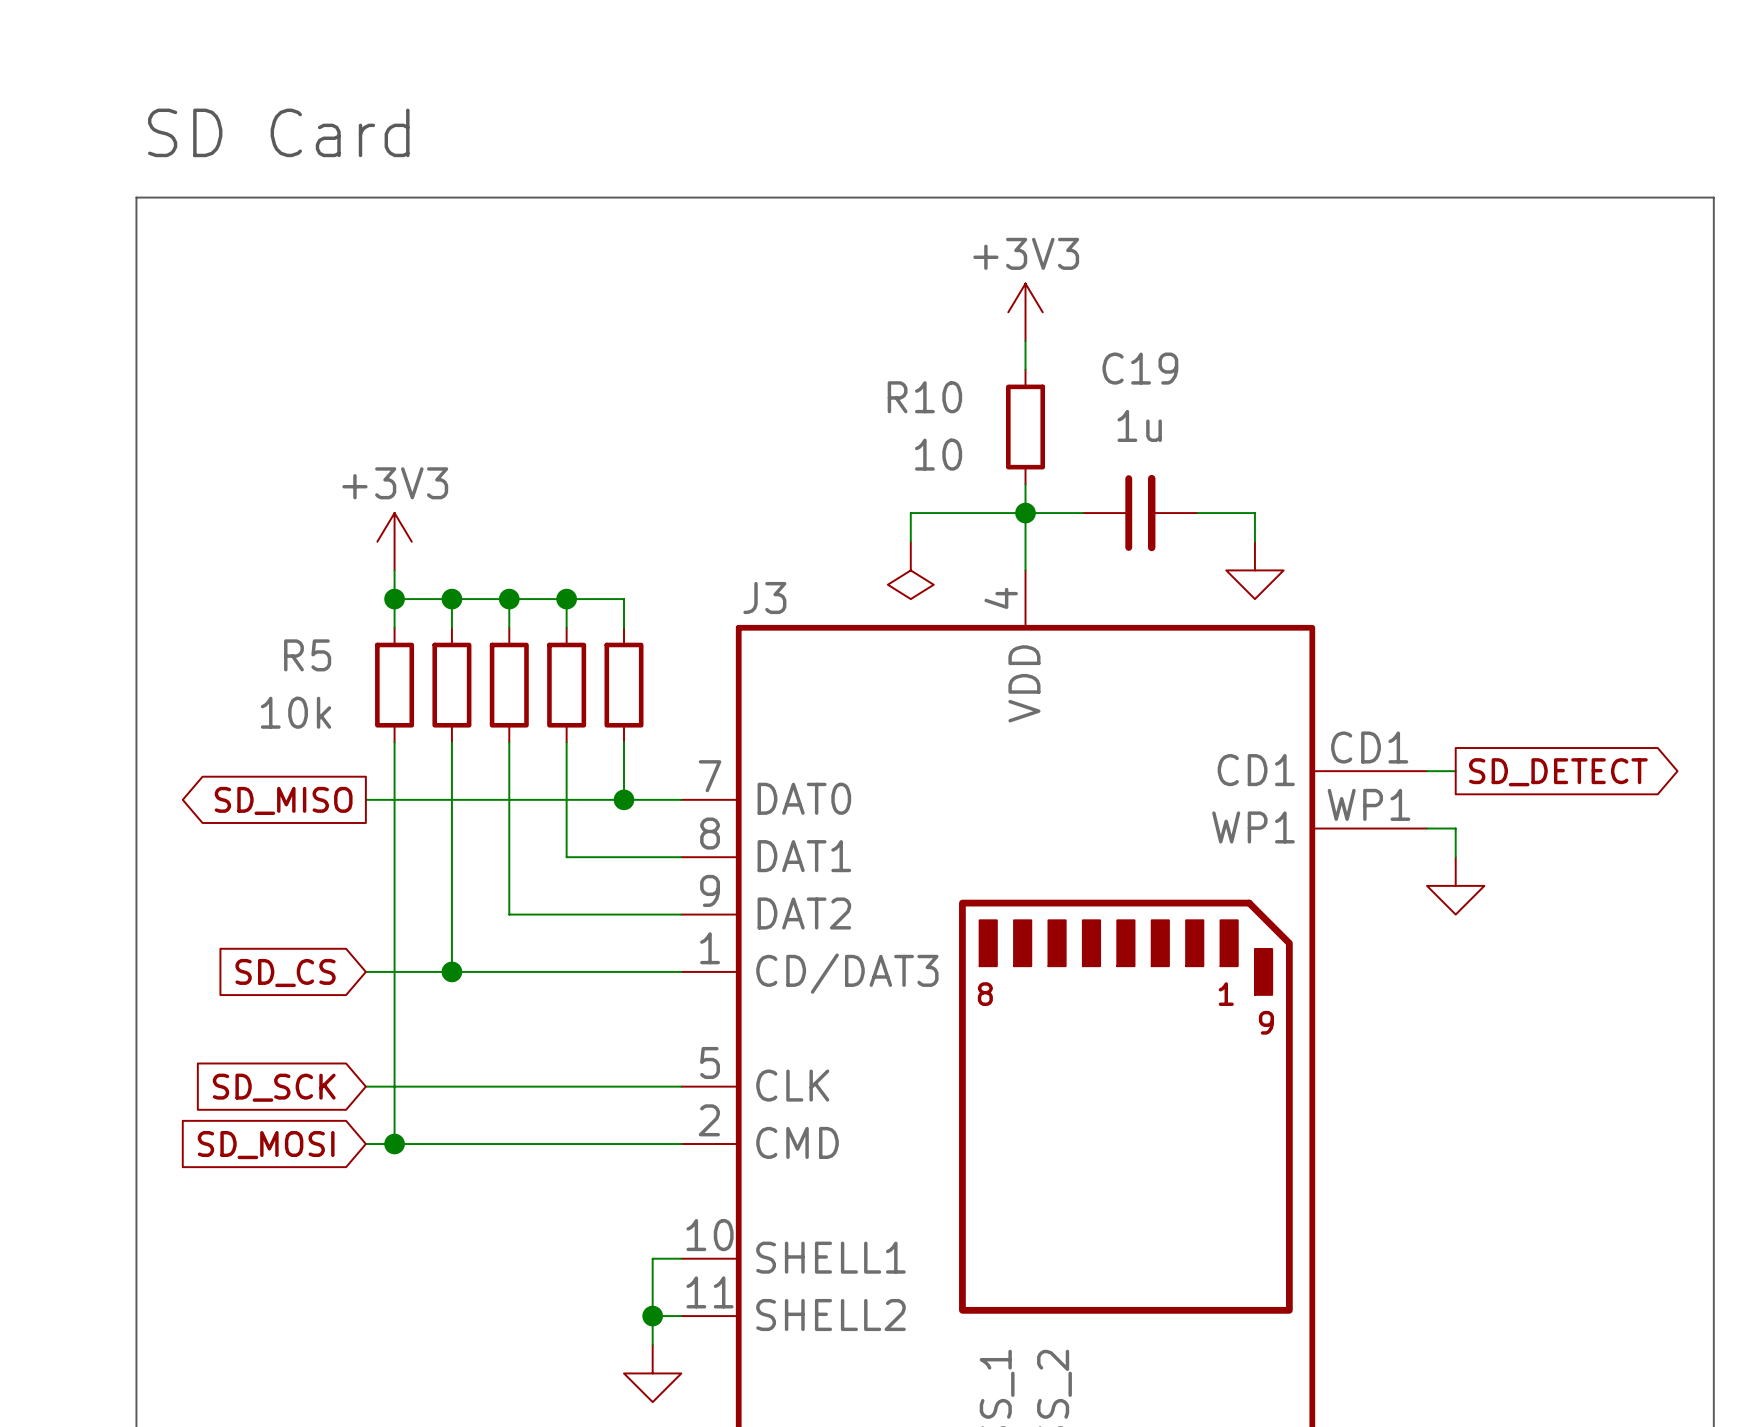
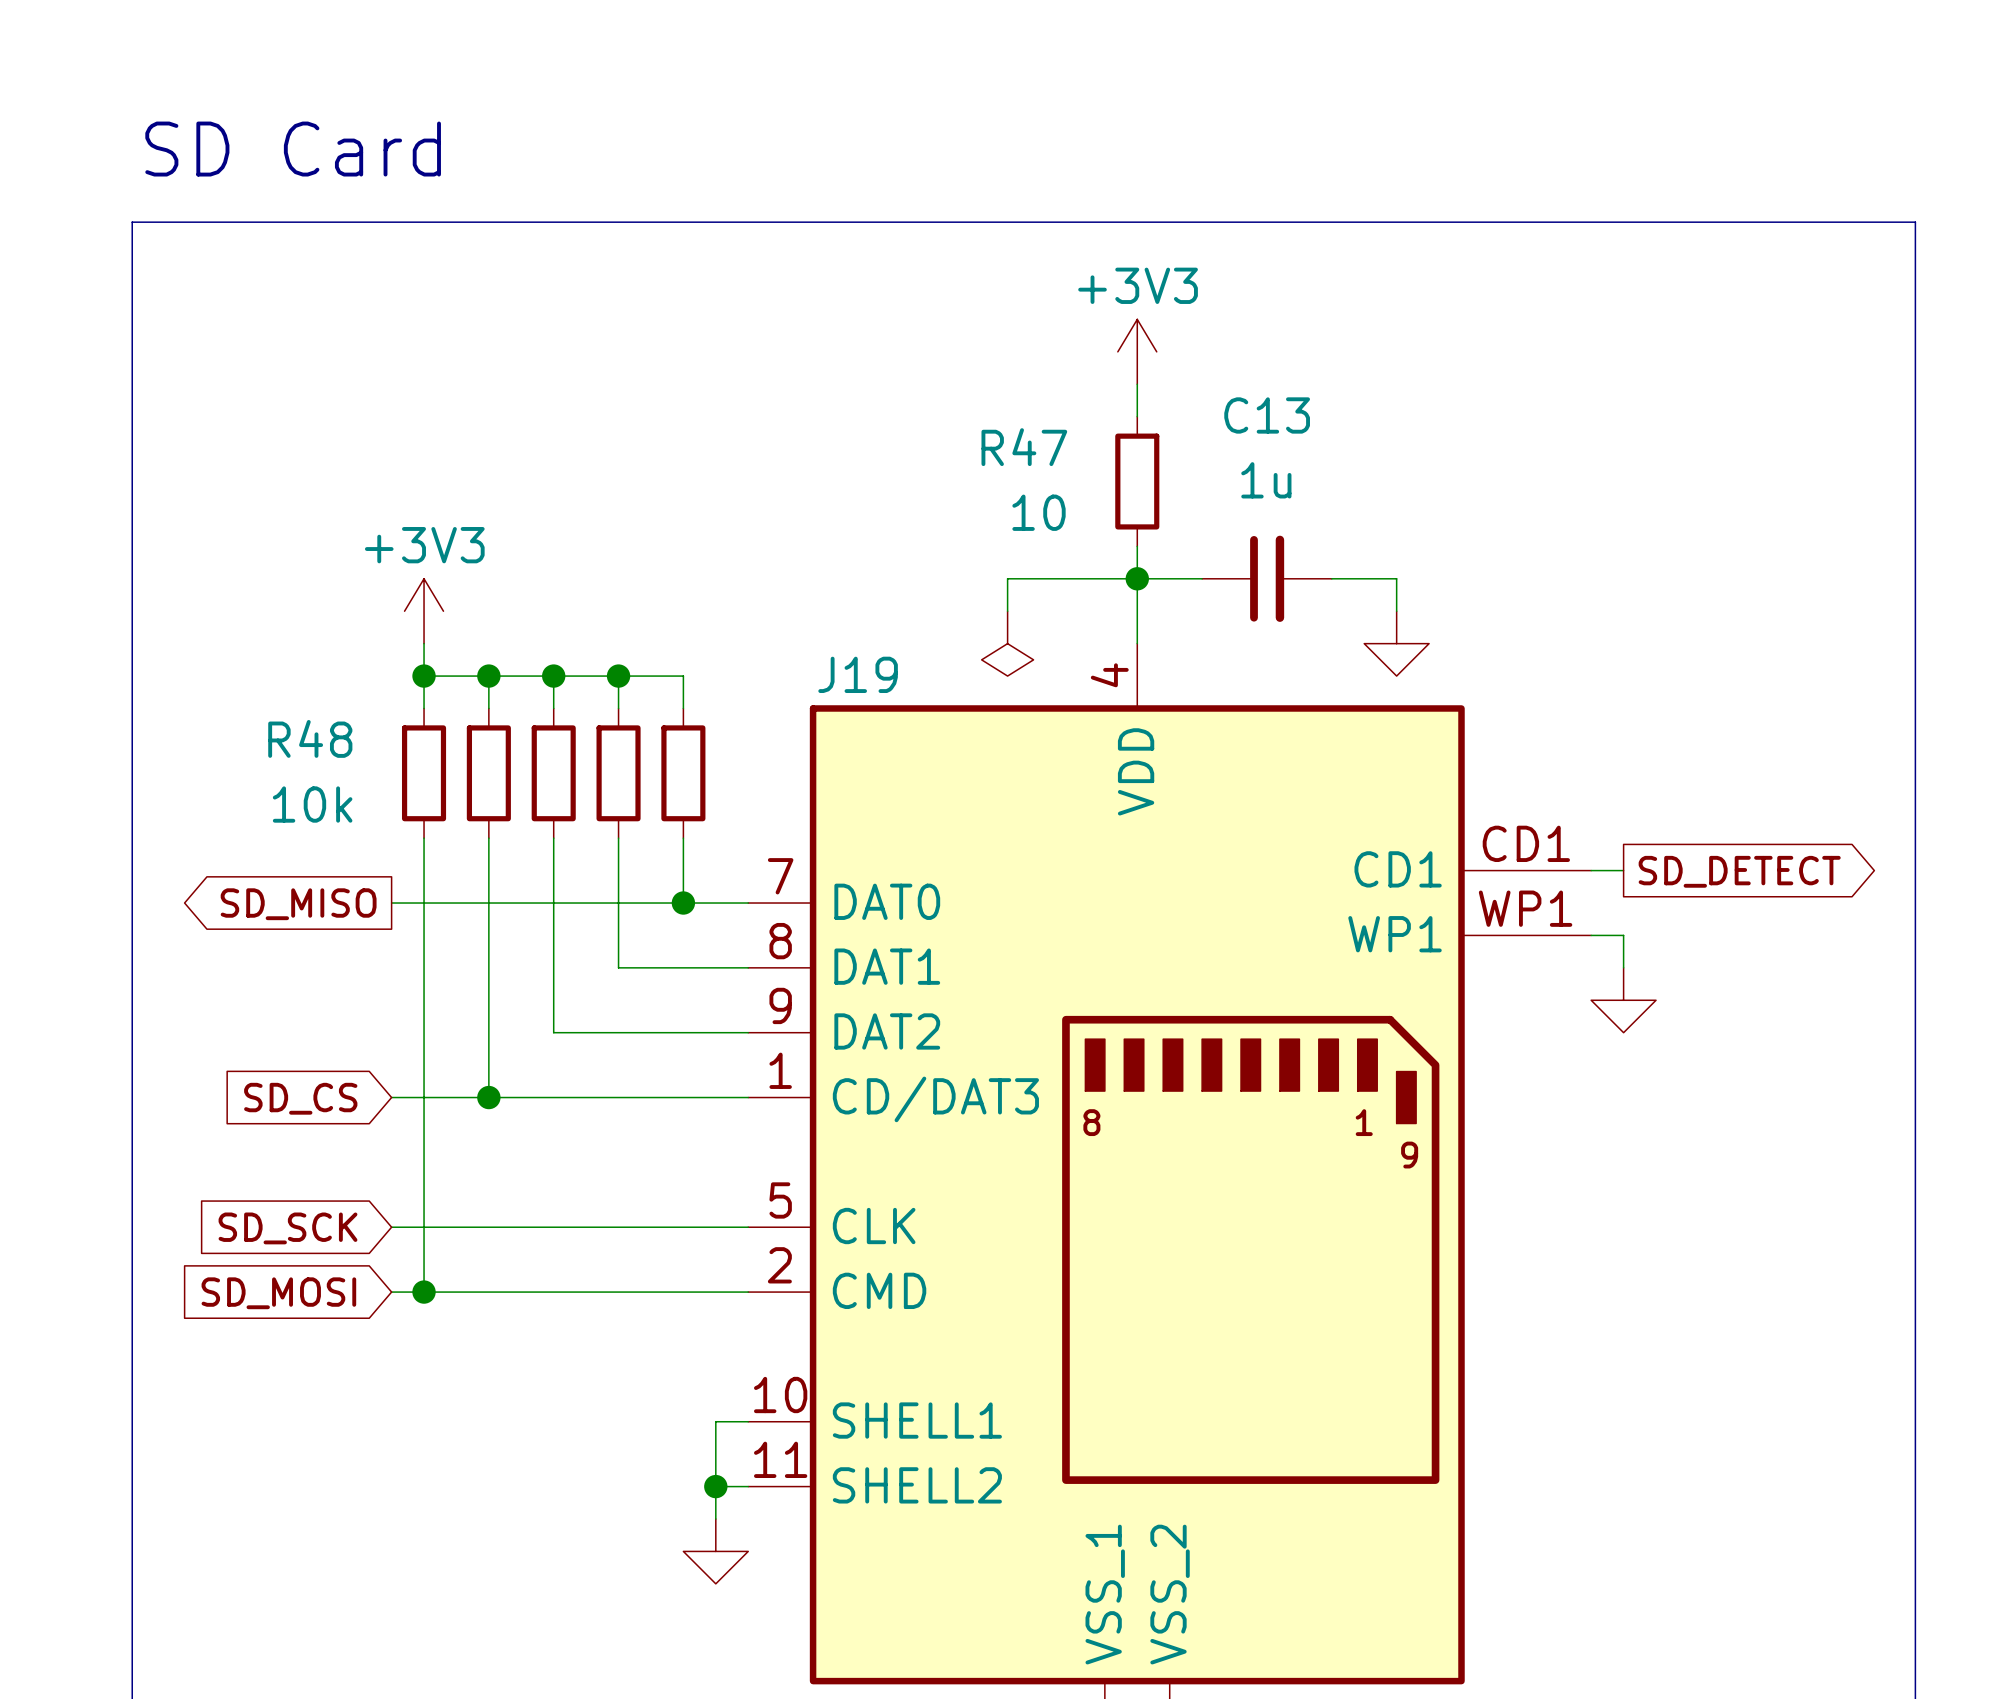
C19 name: C19 (1140, 368) -> C13 (1267, 415)
R10 name: R10 (924, 397) -> R47 (1024, 447)
J3 name: J3 (764, 598) -> J19 (858, 674)
R5 name: R5 (307, 655) -> R48 (310, 738)

